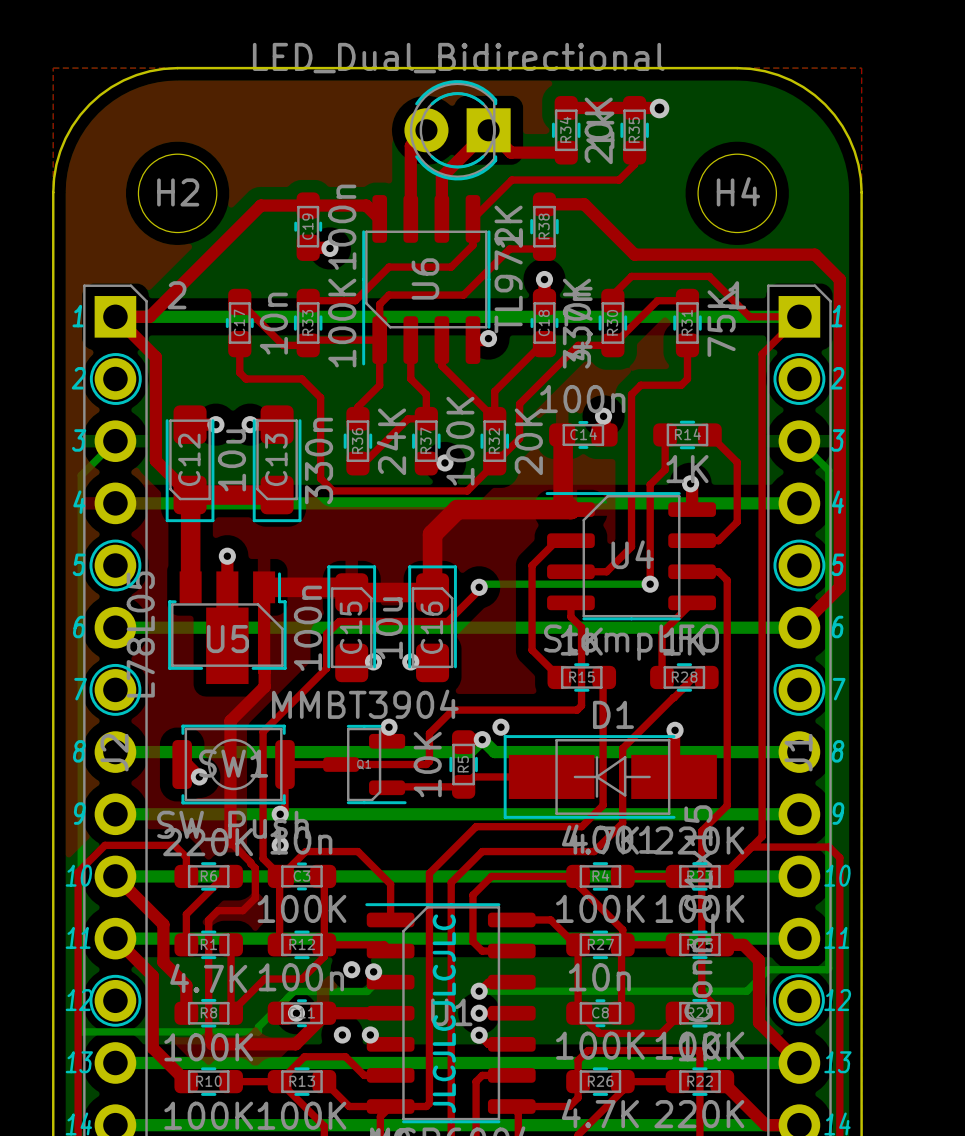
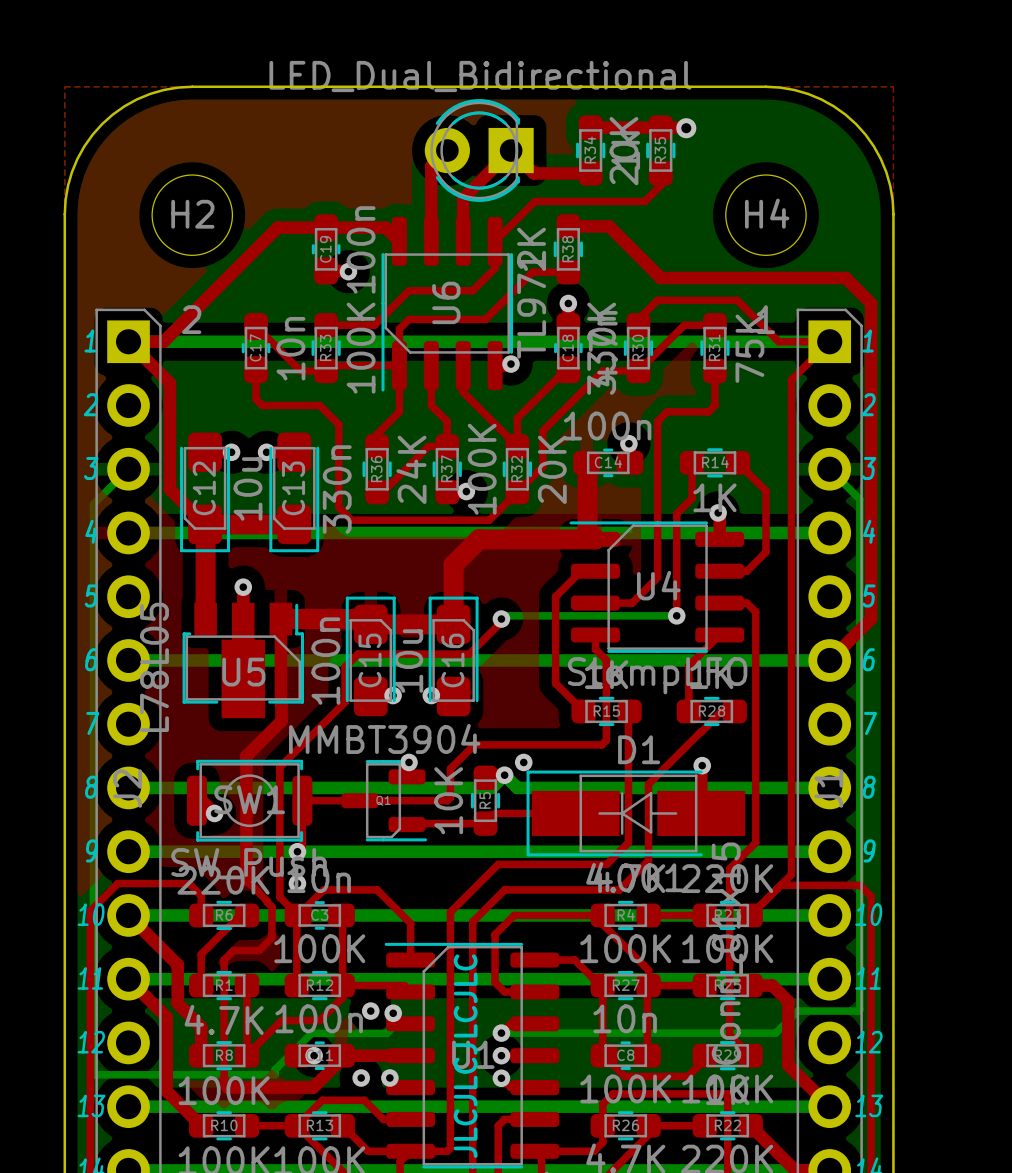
drawing: [89, 353, 142, 405] -> none
drawing: [773, 353, 826, 405] -> none
drawing: [89, 539, 142, 592] -> none
drawing: [773, 539, 826, 592] -> none
drawing: [89, 663, 142, 716] -> none
drawing: [773, 663, 826, 716] -> none
drawing: [89, 974, 142, 1027] -> none
drawing: [772, 974, 825, 1027] -> none

